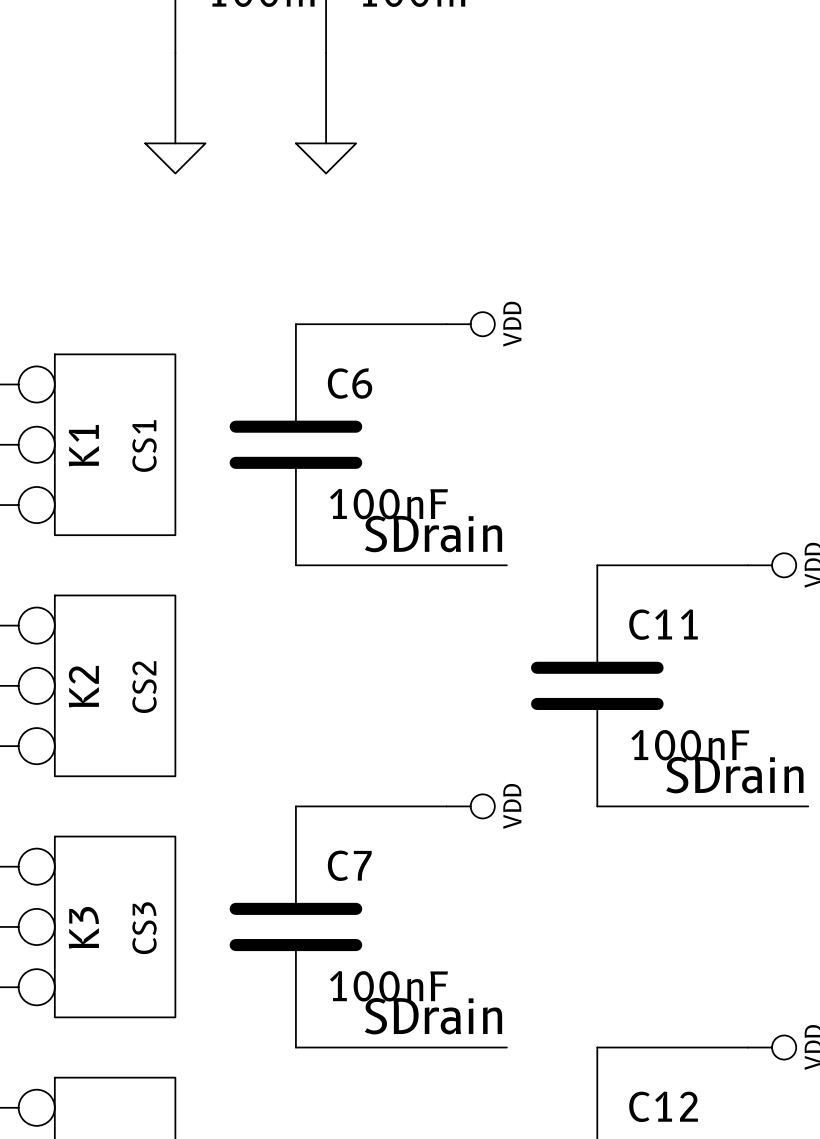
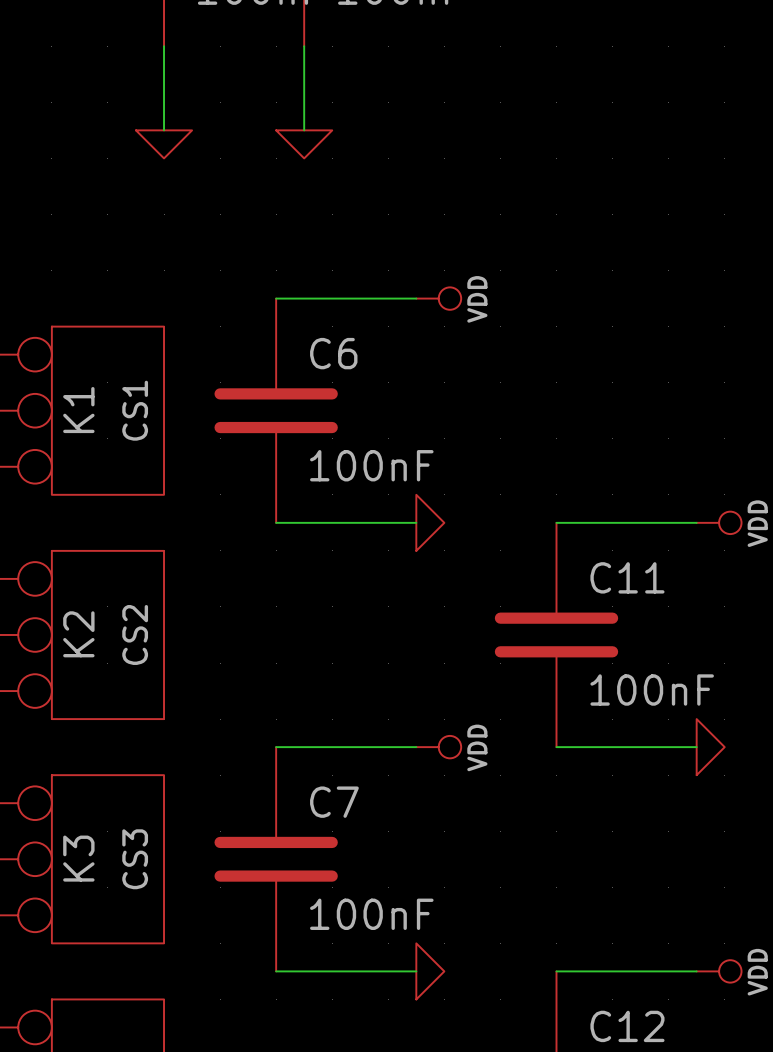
label: SDrain (433, 534) -> none
wire: (446, 565) (506, 565) -> none
power symbol: none -> (430, 522)
label: SDrain (734, 775) -> none
wire: (747, 806) (808, 806) -> none
power symbol: none -> (710, 747)
label: SDrain (433, 1016) -> none
wire: (446, 1047) (506, 1047) -> none
power symbol: none -> (430, 971)

